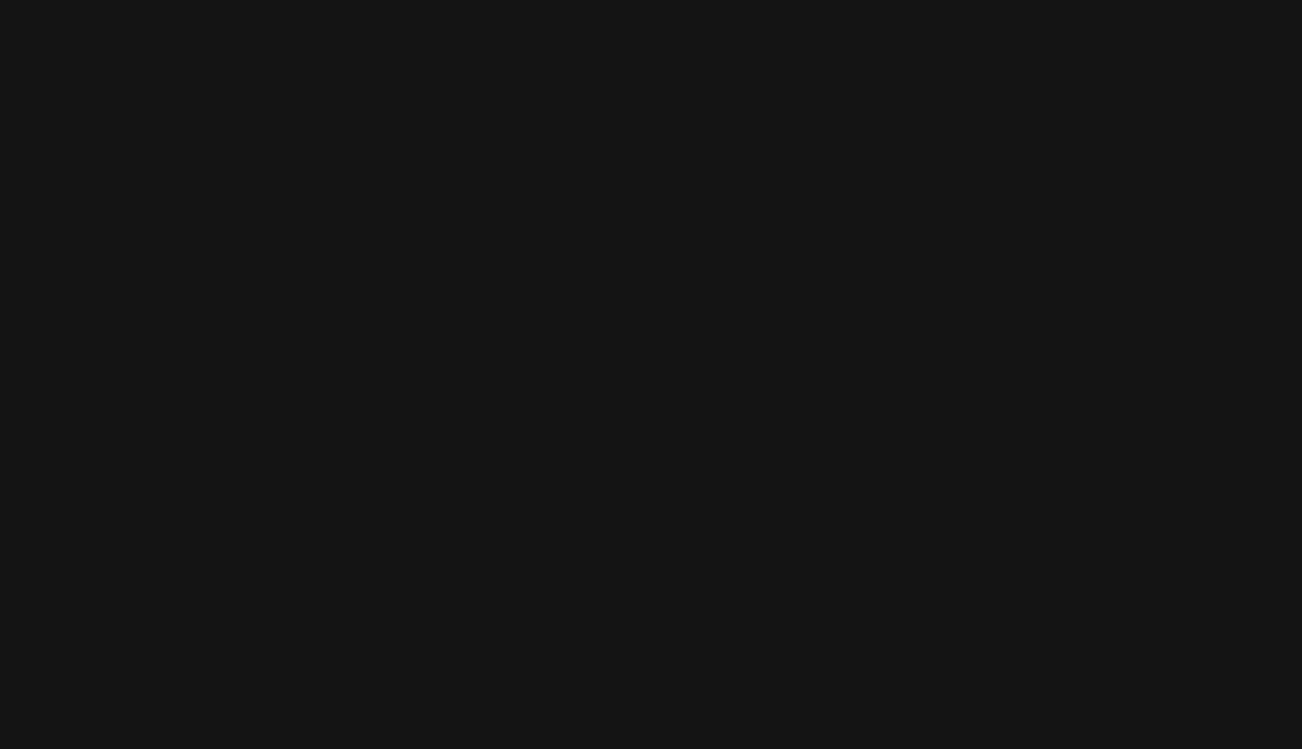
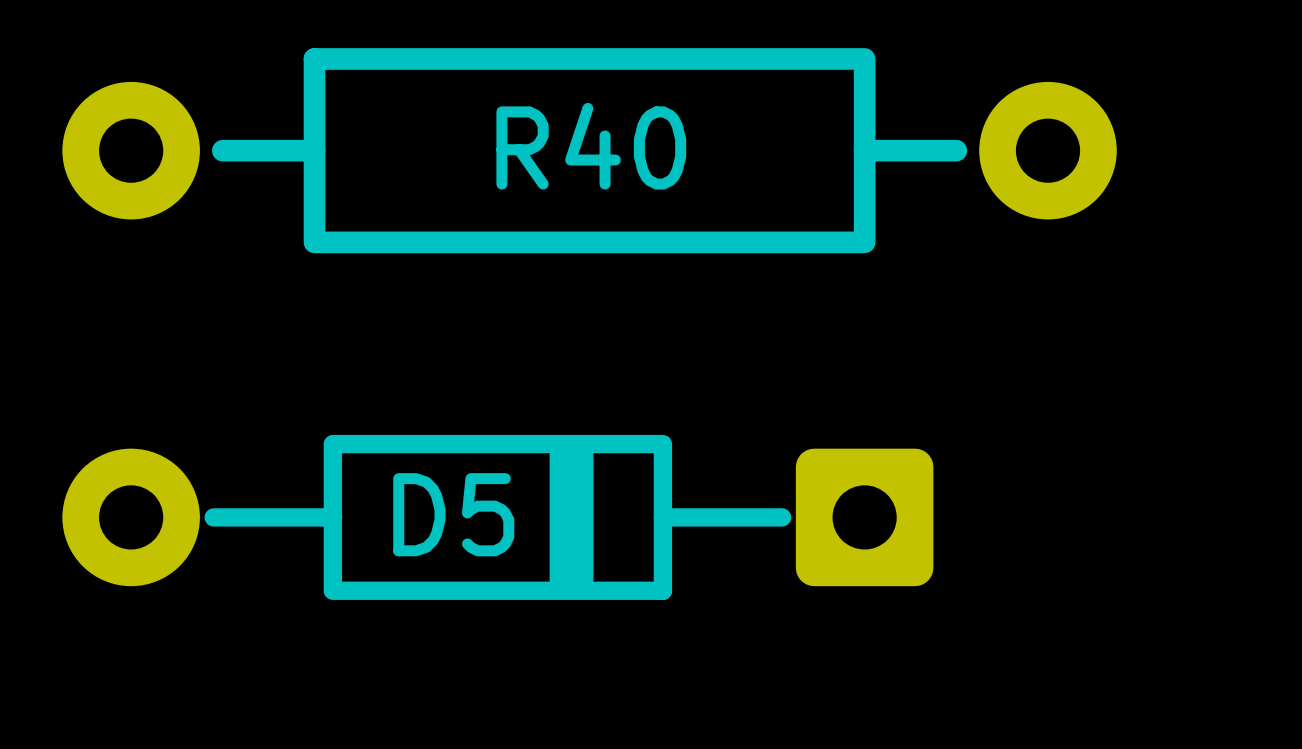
R40: none -> (589, 150)
D5: none -> (497, 517)

